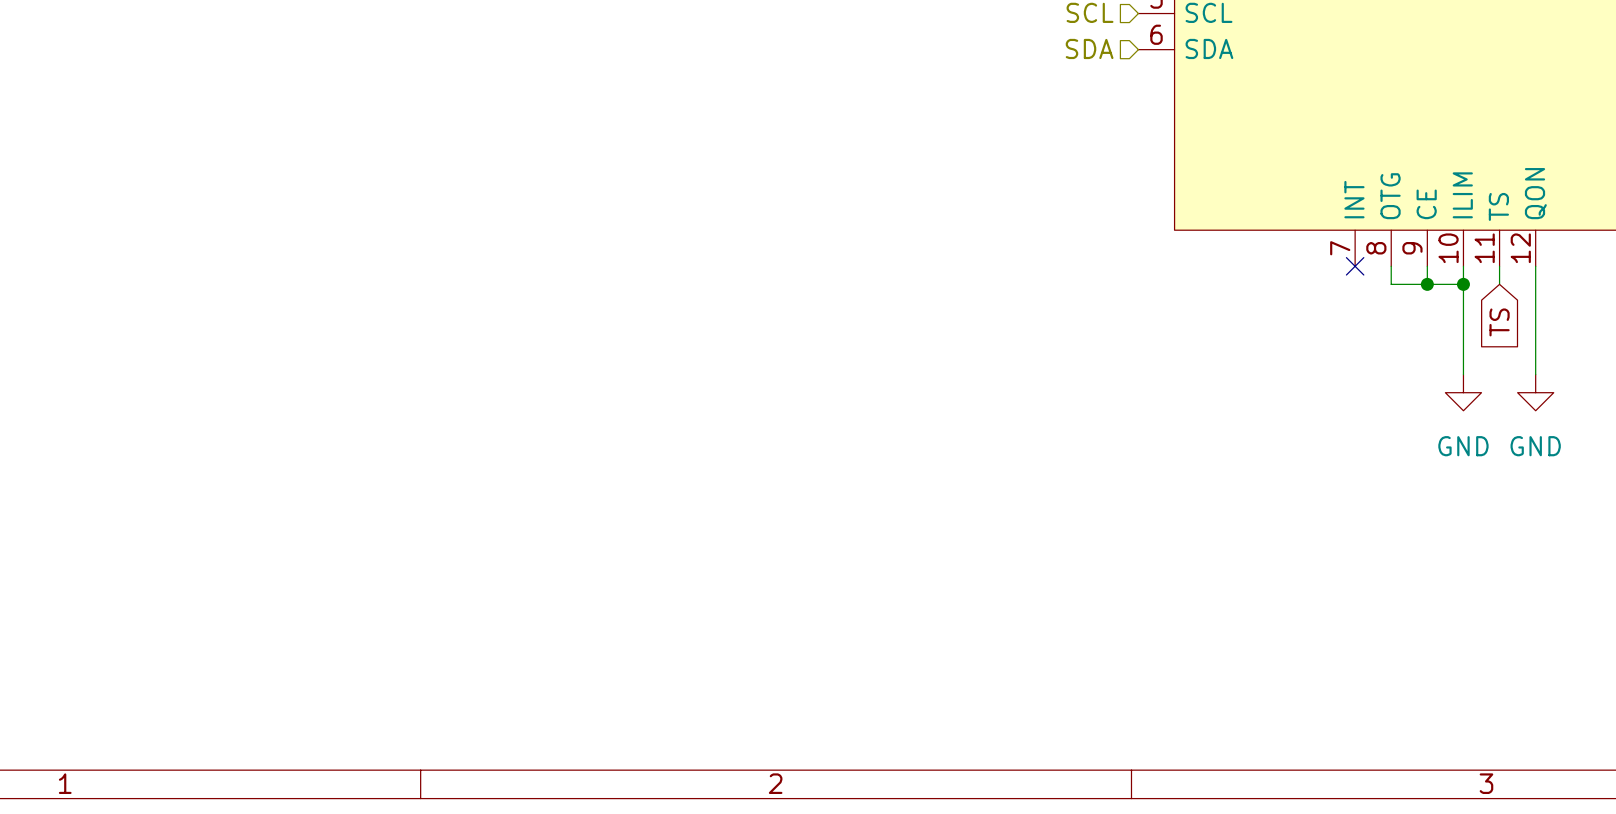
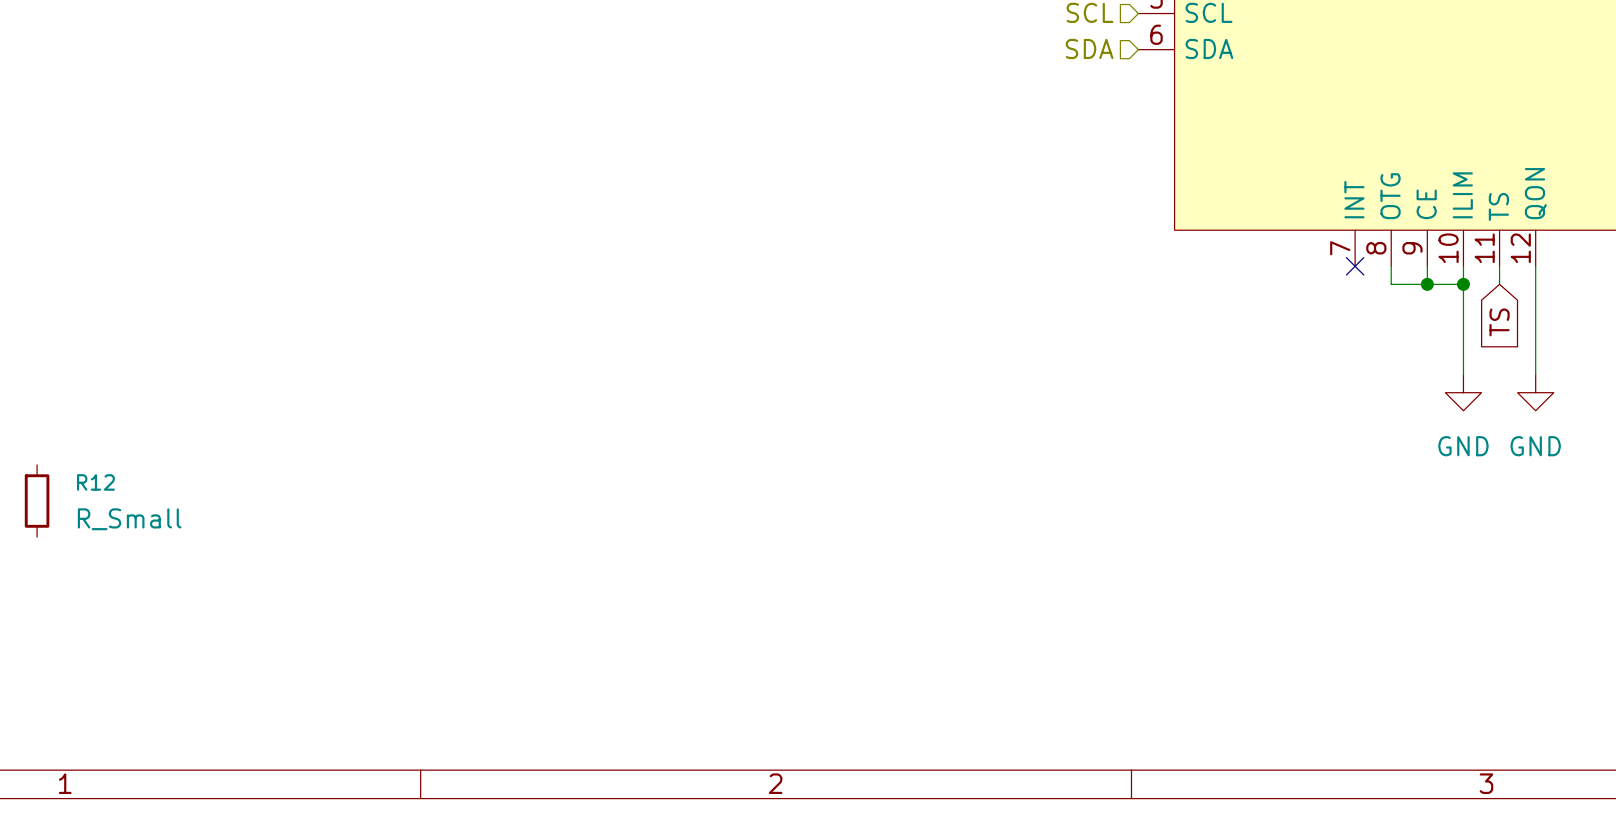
R12: none -> R_Small (37, 501)

